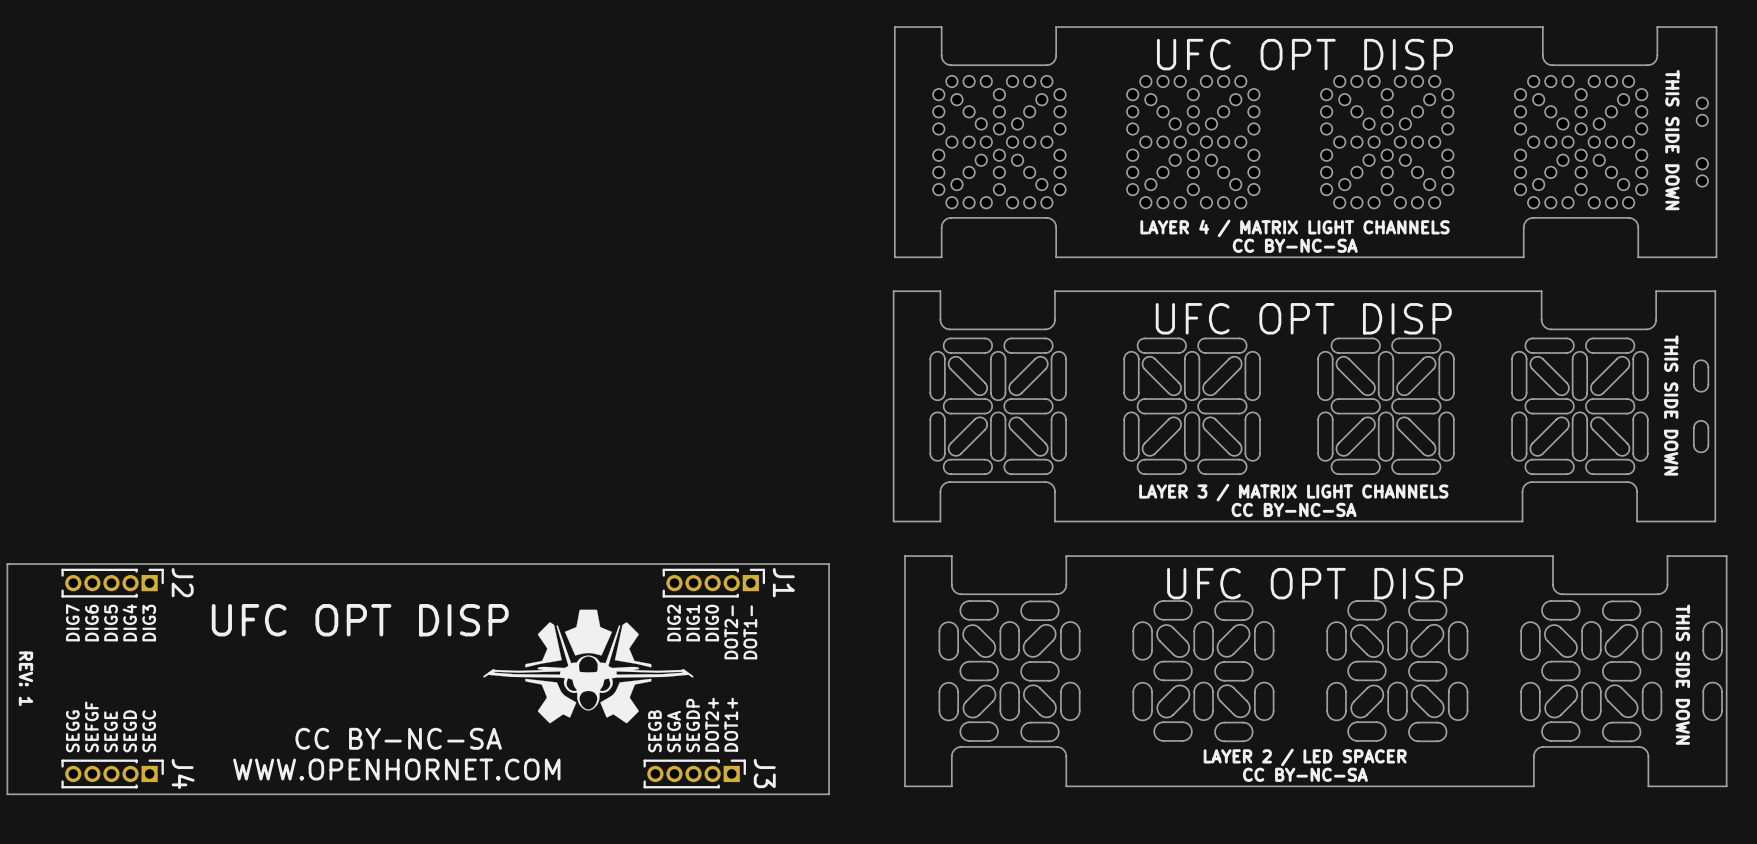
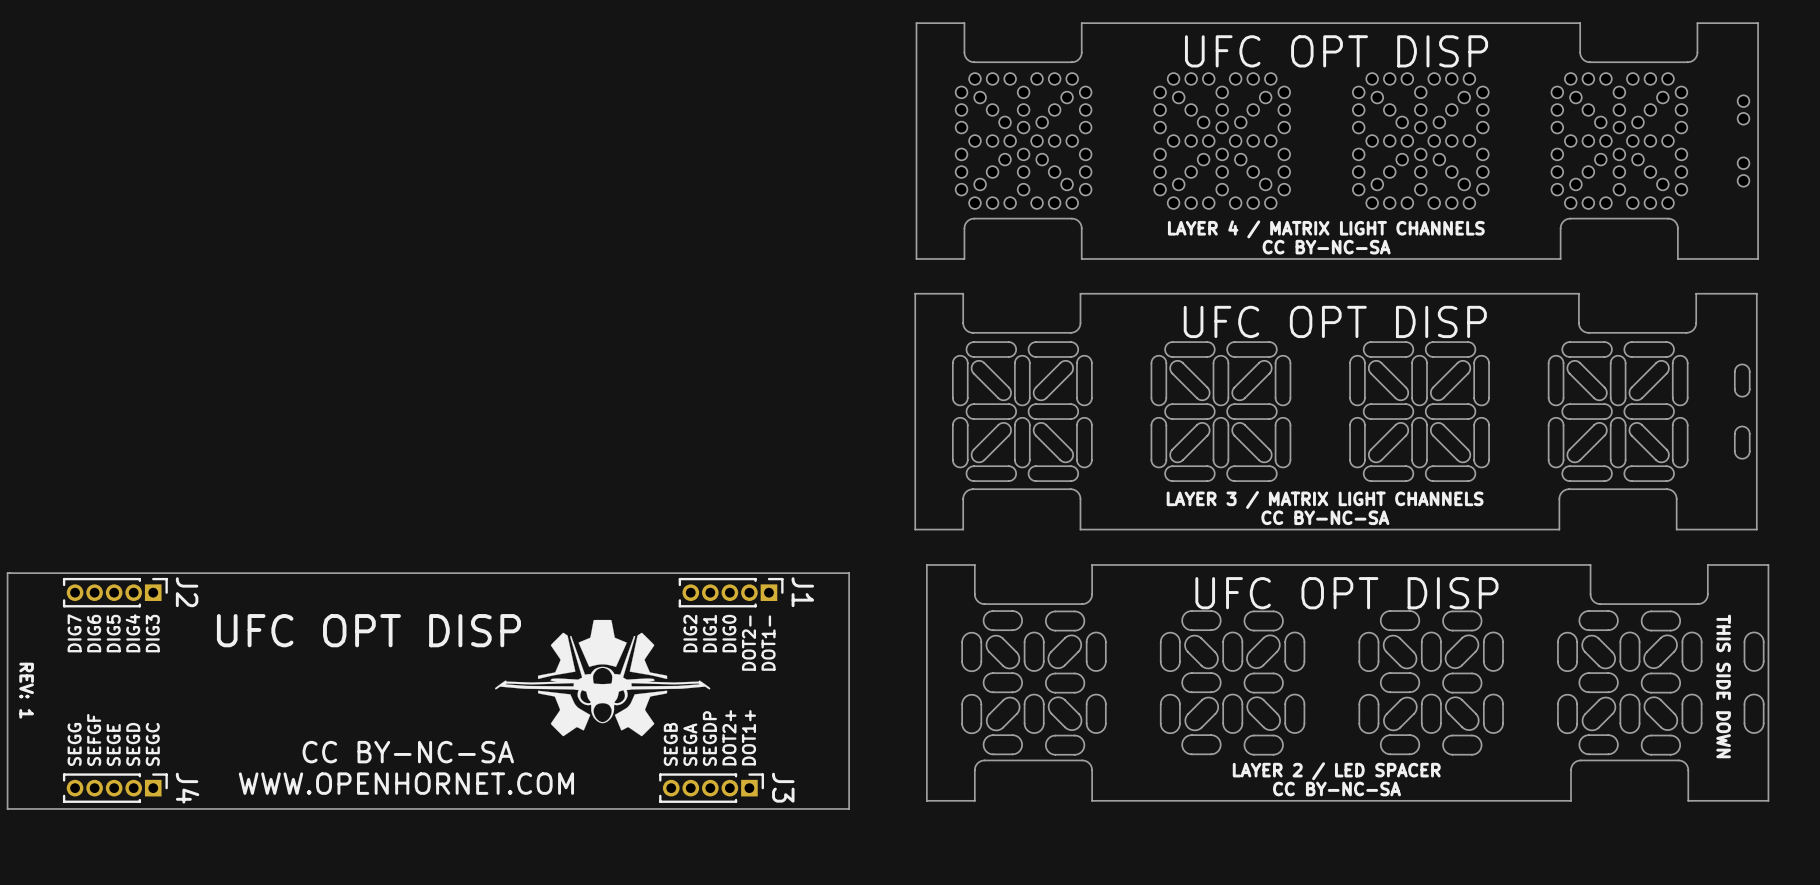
text: THIS SIDE DOWN (1672, 140) -> none
text: THIS SIDE DOWN (1671, 405) -> none

